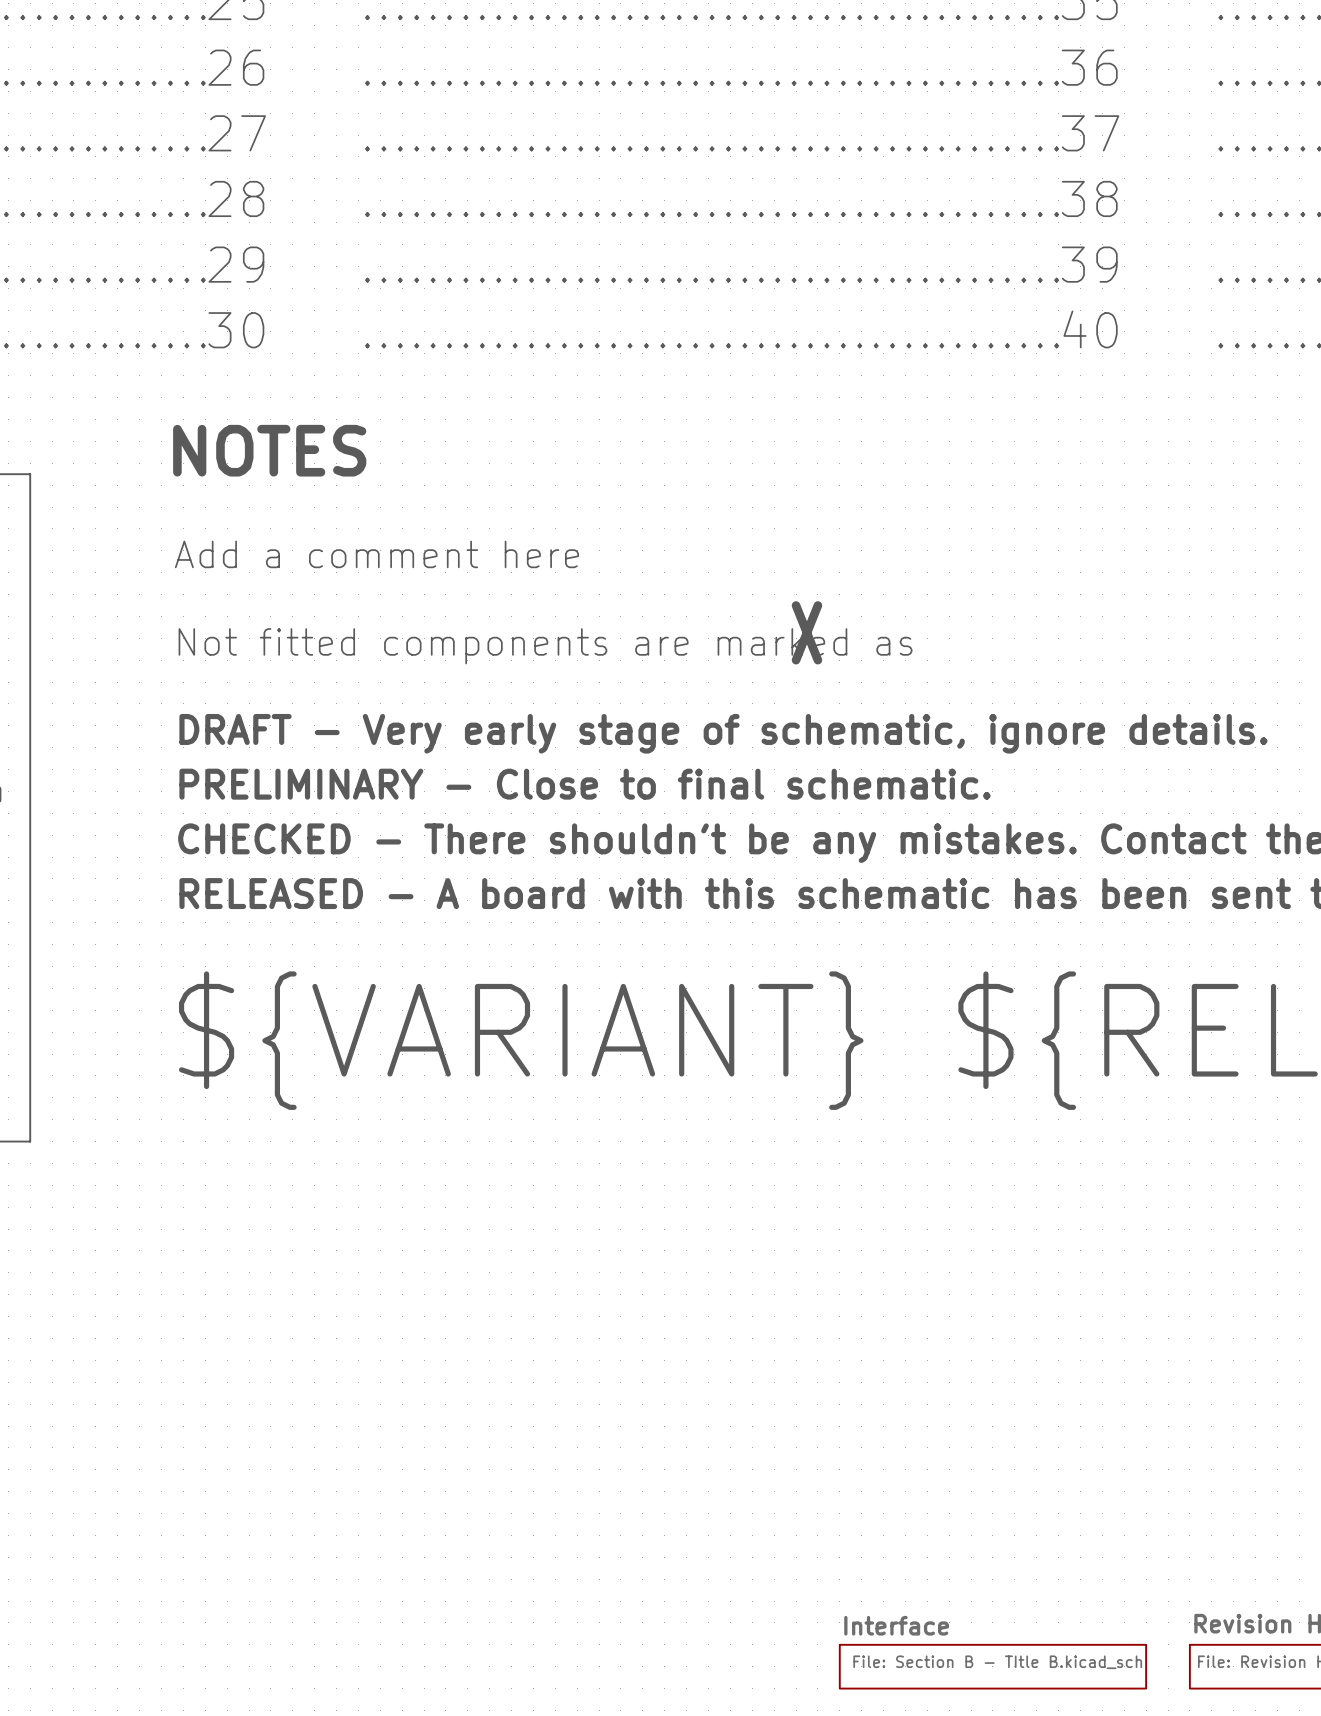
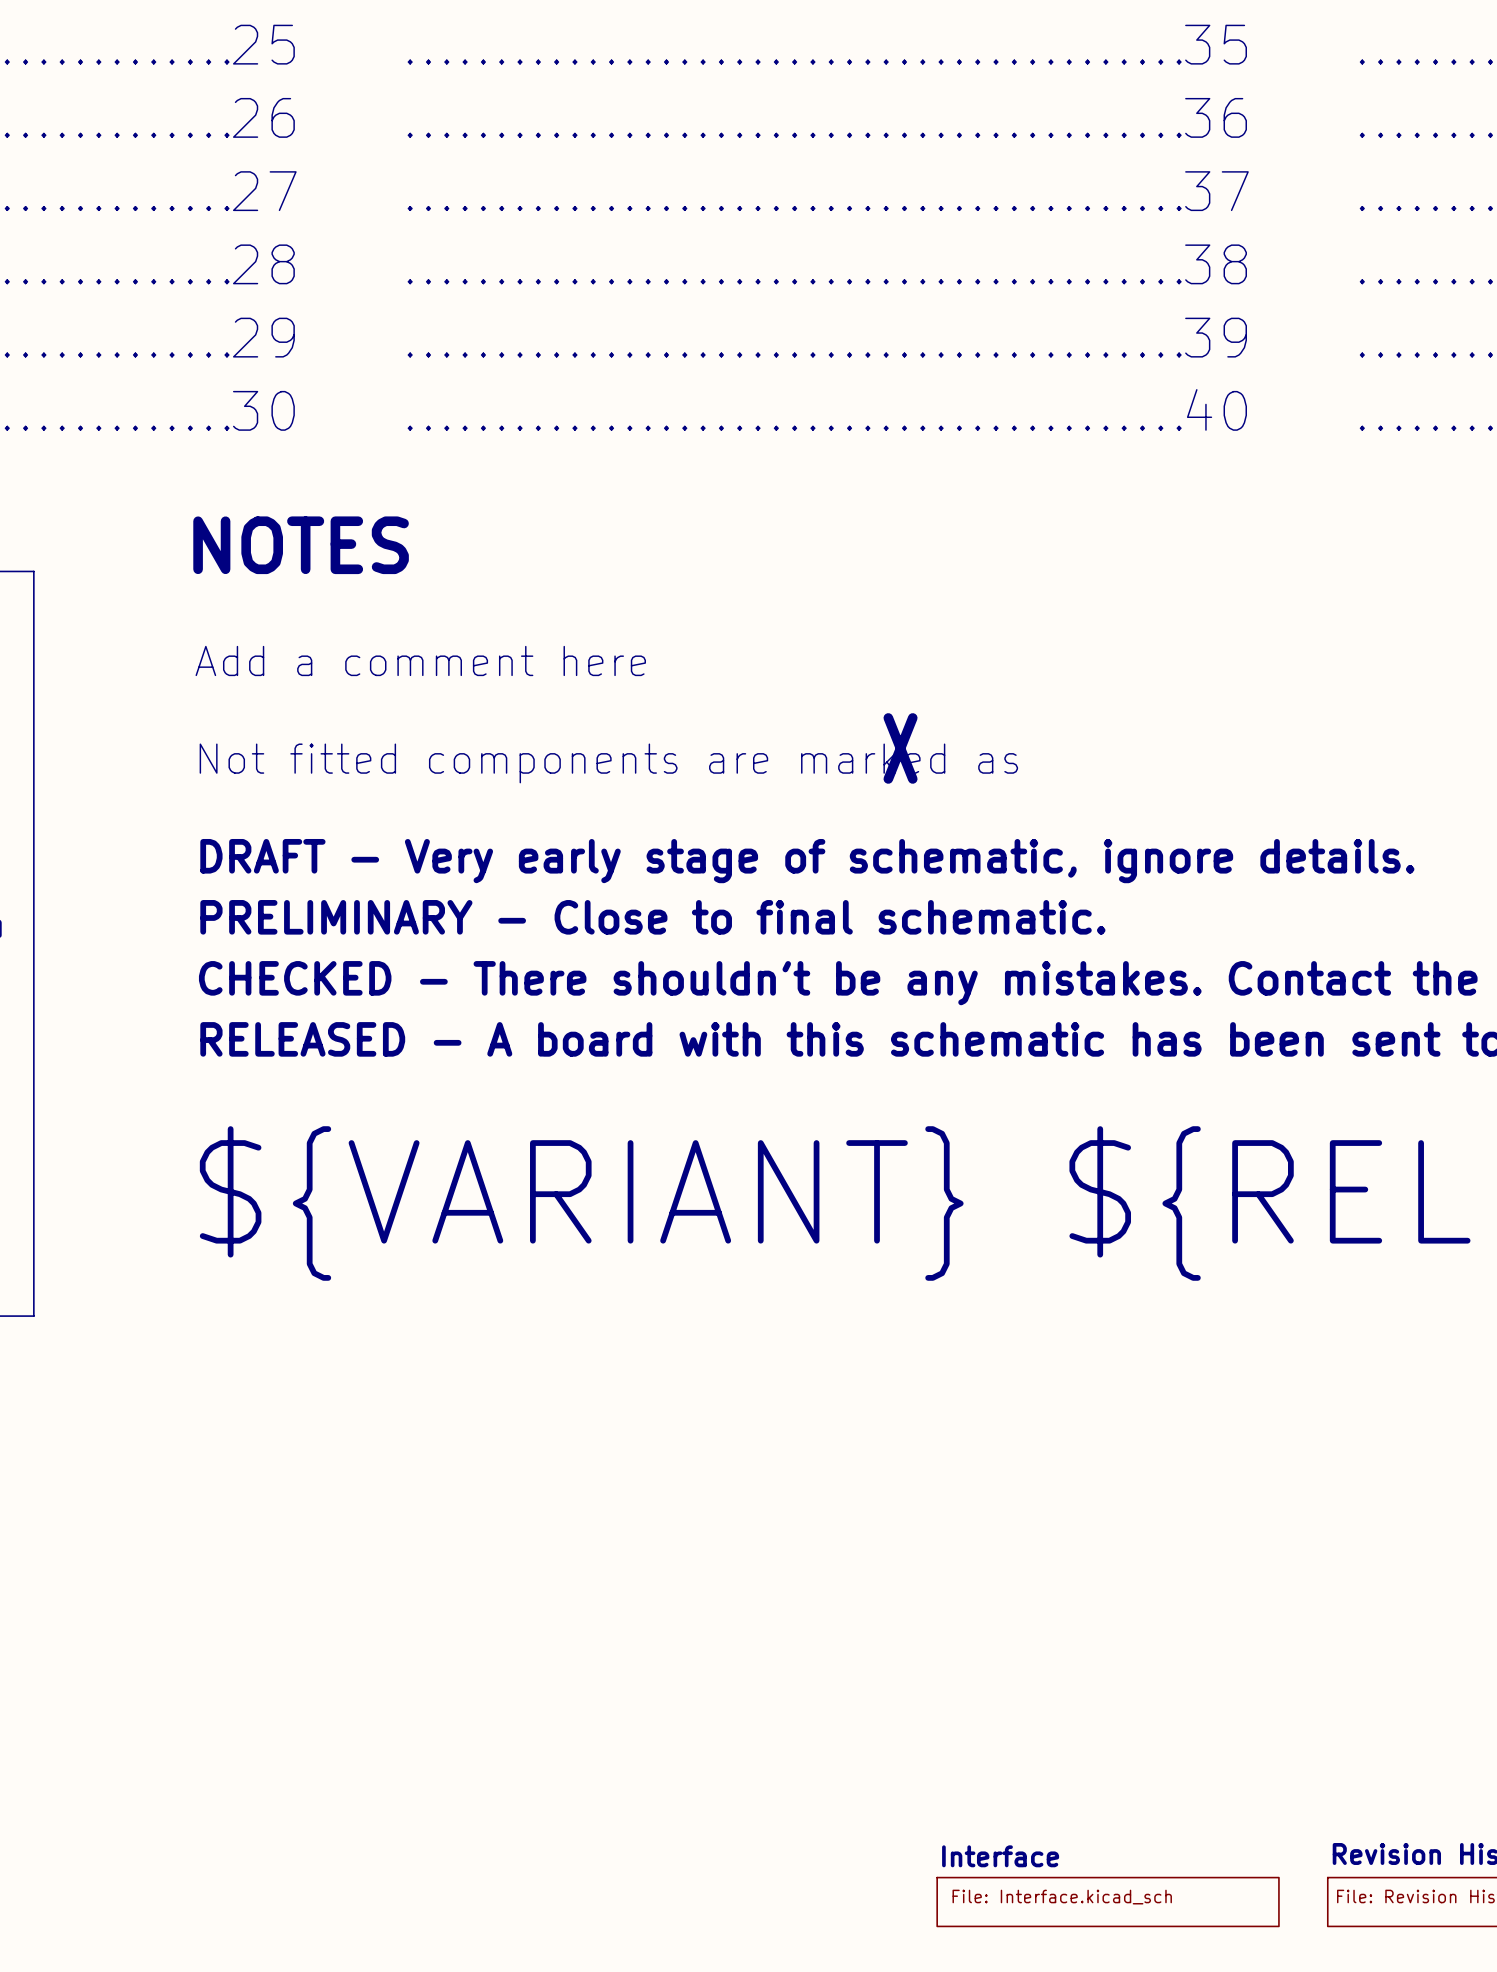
sheet Interface value: File: Section B - TItle B.kicad_sch (997, 1662) -> File: Interface.kicad_sch (1062, 1897)

